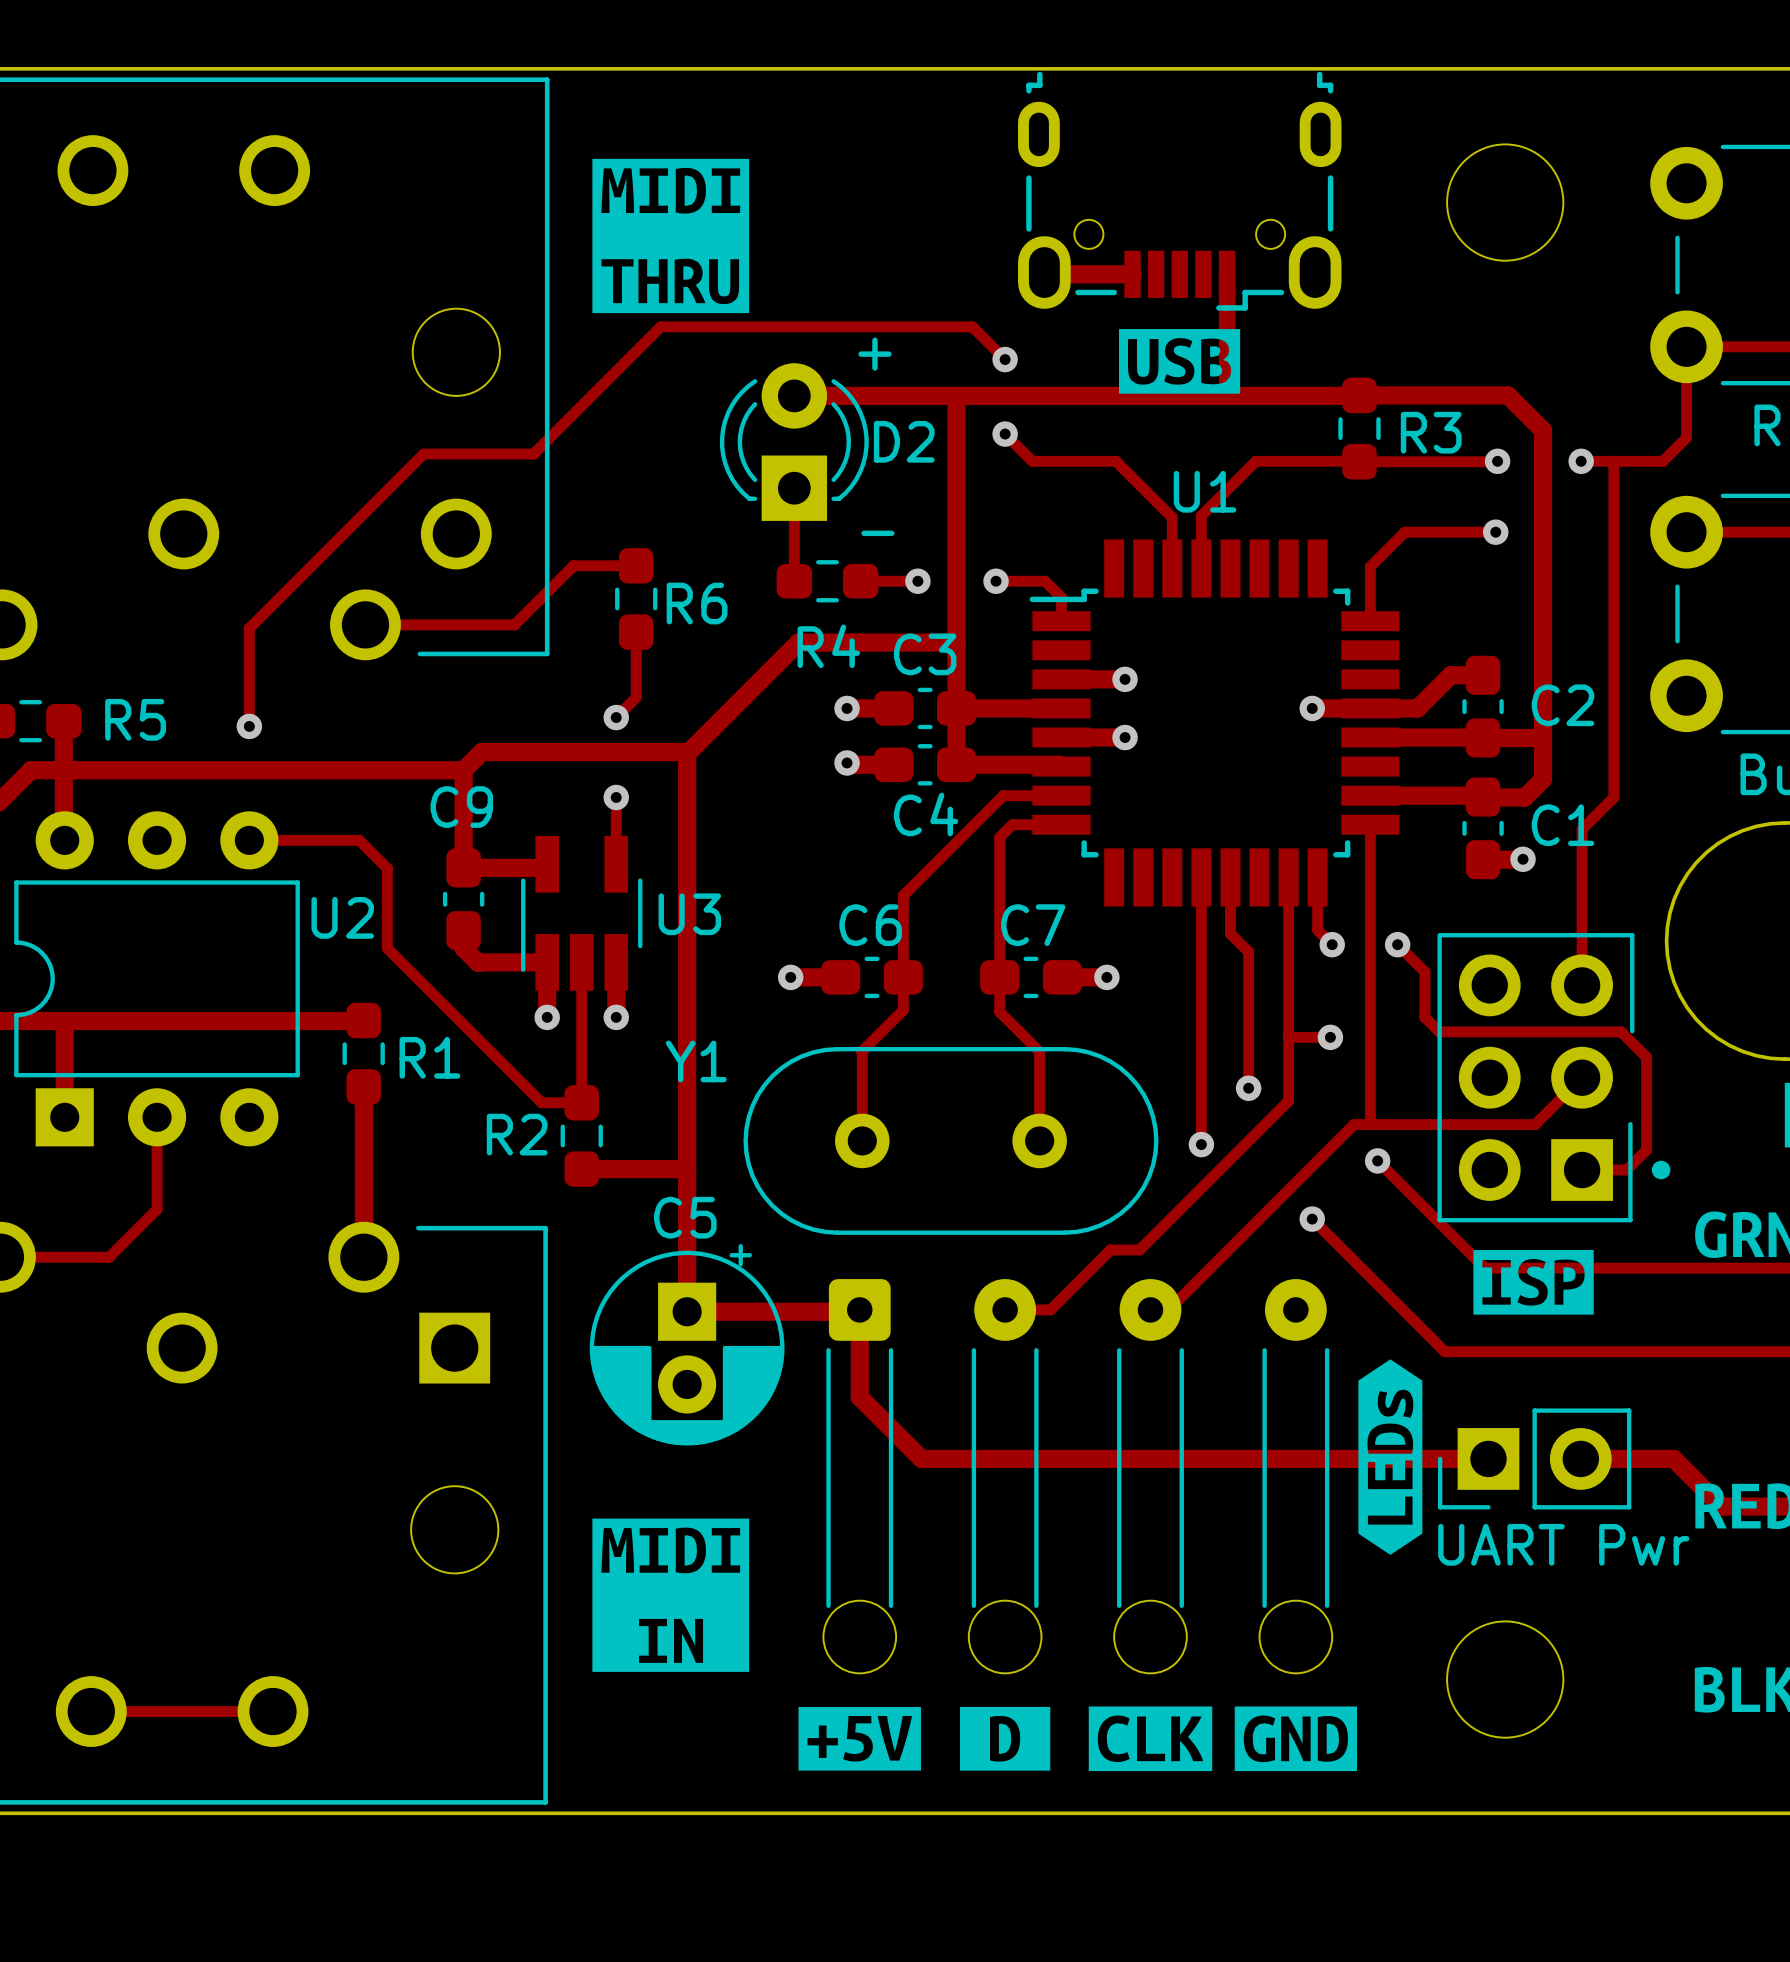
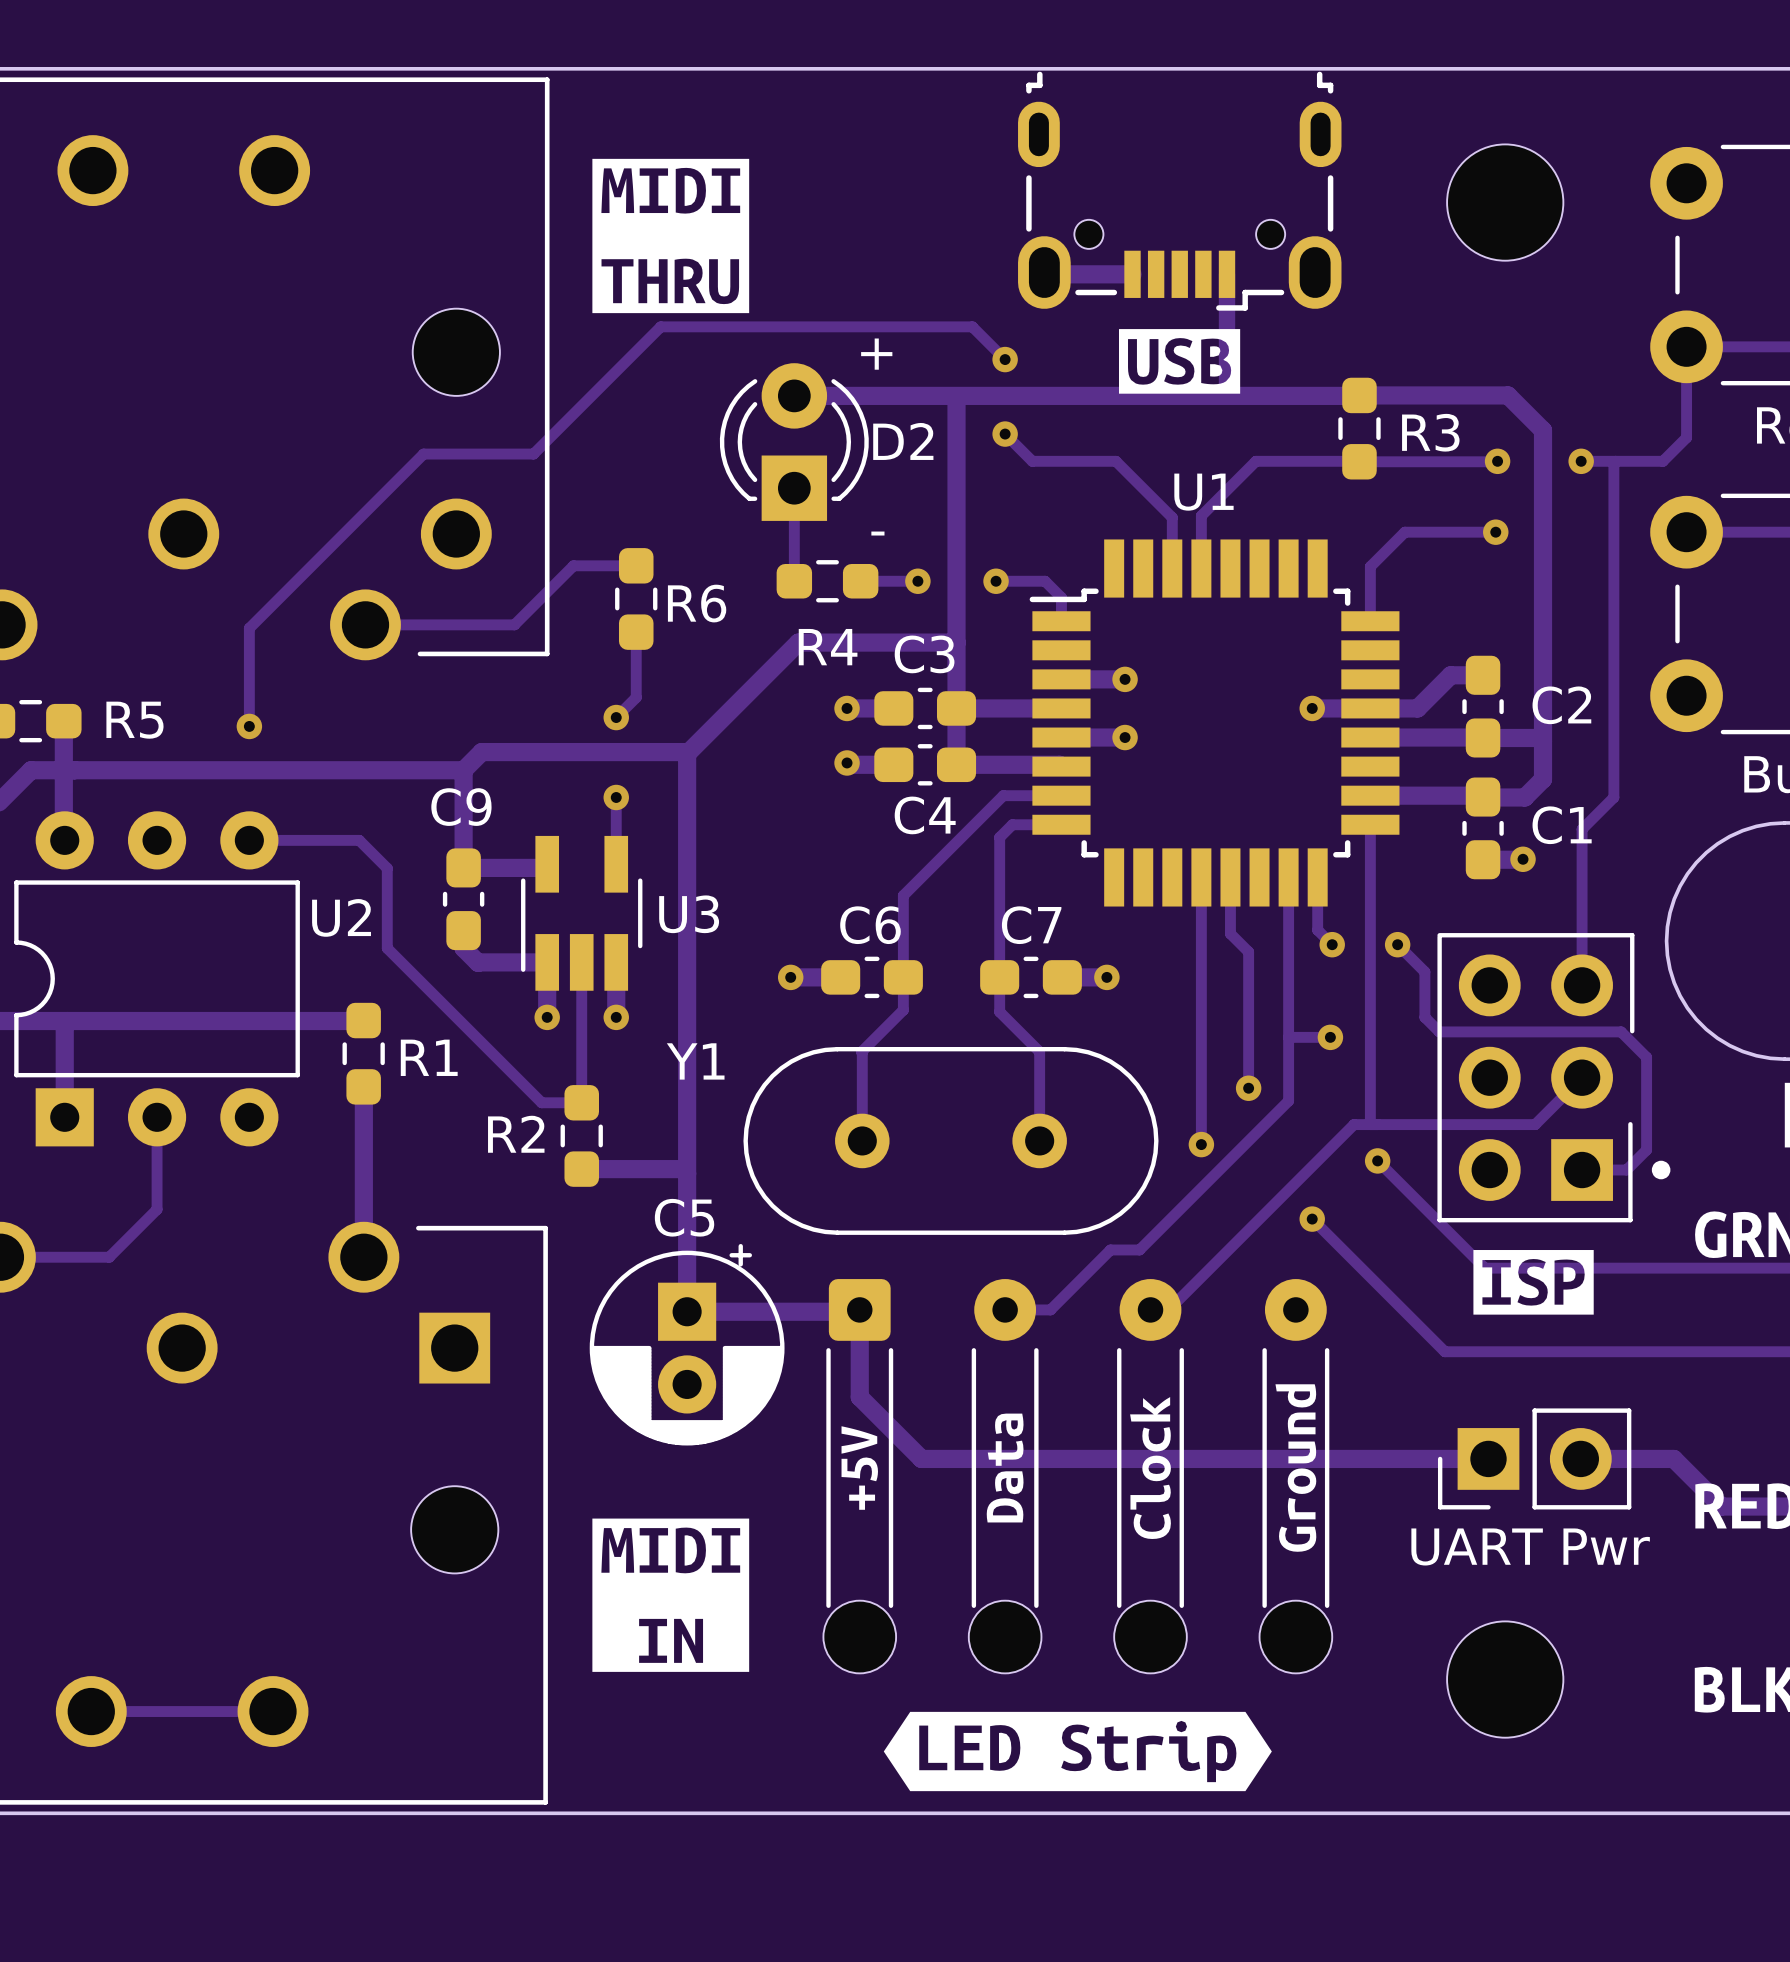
drawing: [1358, 1359, 1423, 1555] -> none
drawing: none -> [1275, 1384, 1317, 1552]
drawing: none -> [1130, 1397, 1171, 1539]
drawing: none -> [986, 1413, 1024, 1523]
drawing: none -> [841, 1426, 878, 1510]
part value position: UART Pwr (1563, 1544) -> UART Pwr (1530, 1546)
drawing: [798, 1706, 1358, 1772] -> none
drawing: none -> [883, 1711, 1272, 1792]

